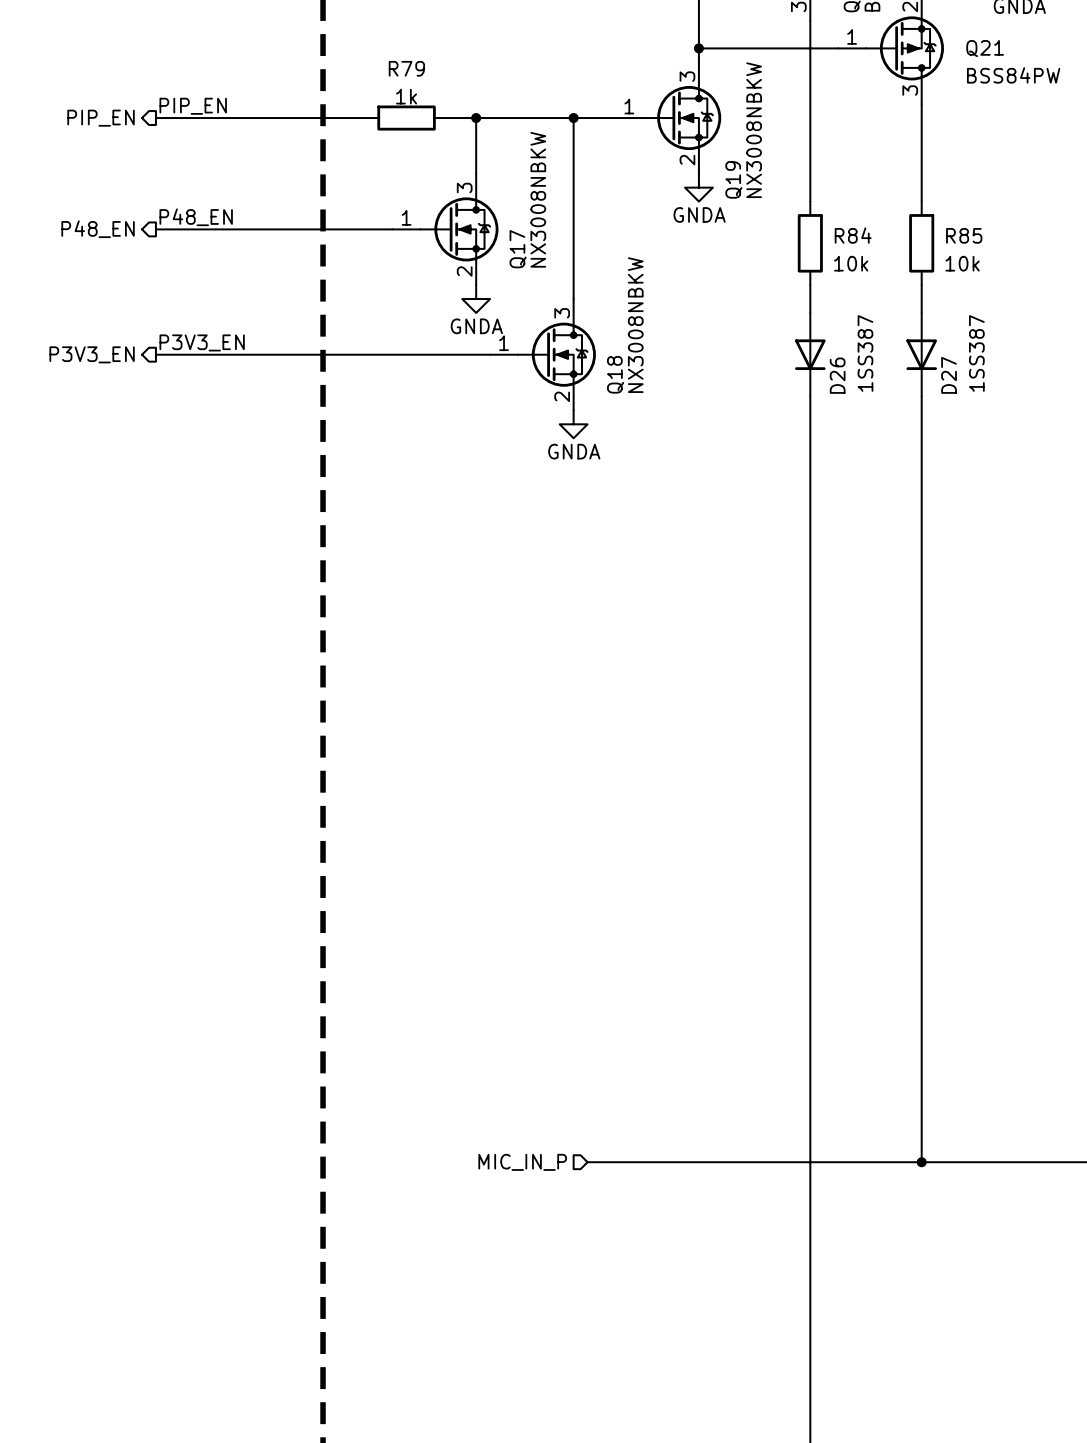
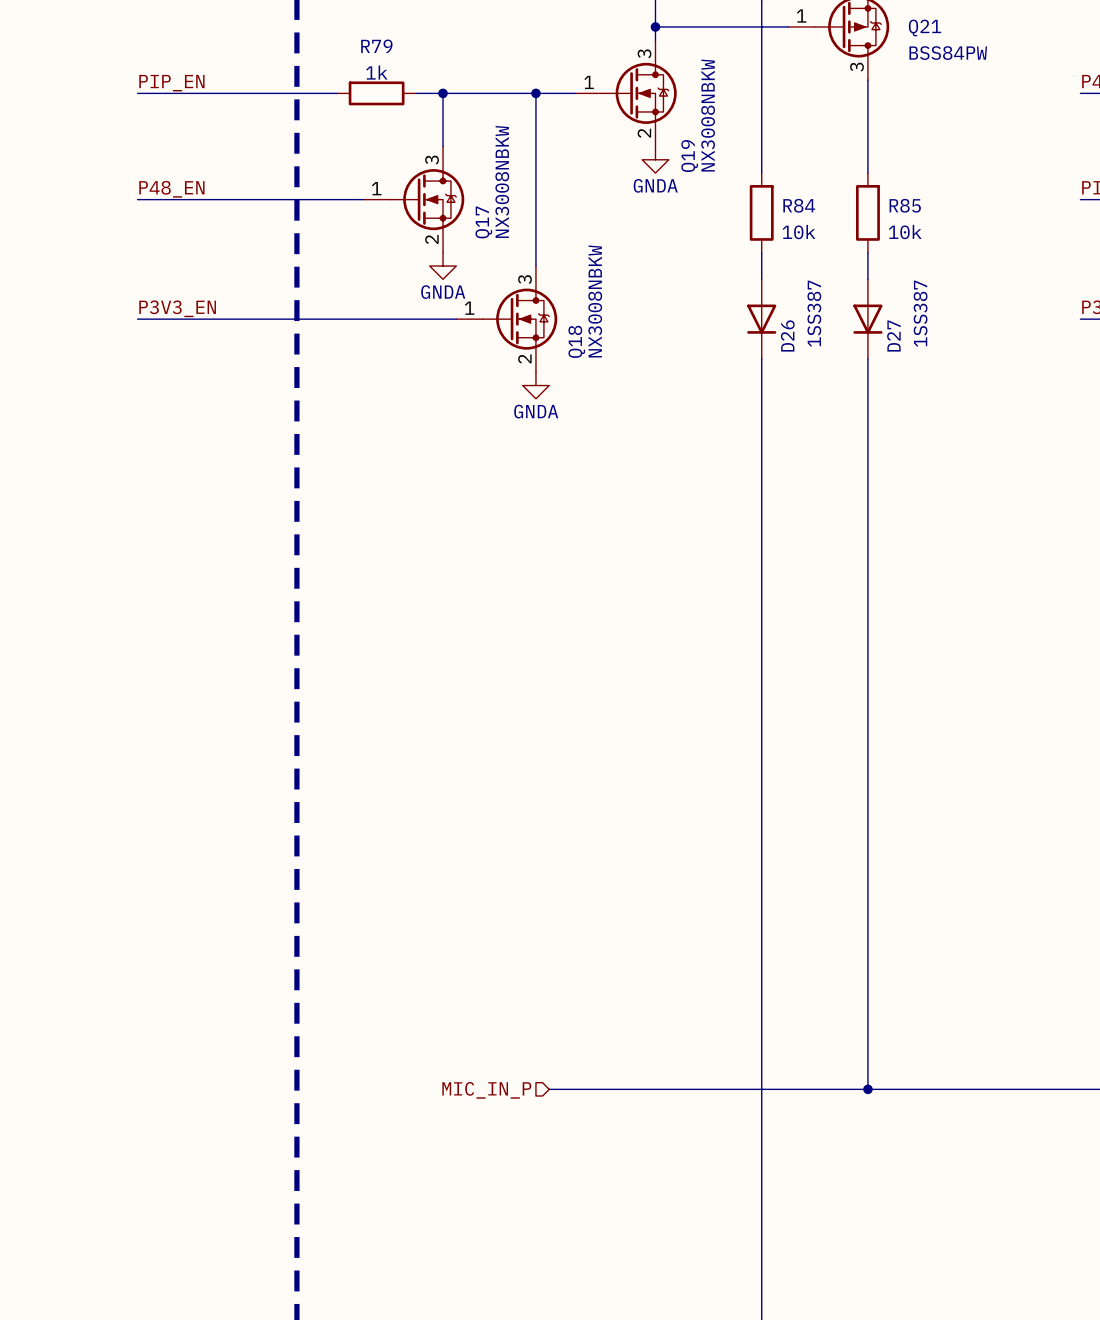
hierarchical label: PIP_EN (101, 118) -> none
hierarchical label: P48_EN (98, 229) -> none
hierarchical label: P3V3_EN (92, 354) -> none

